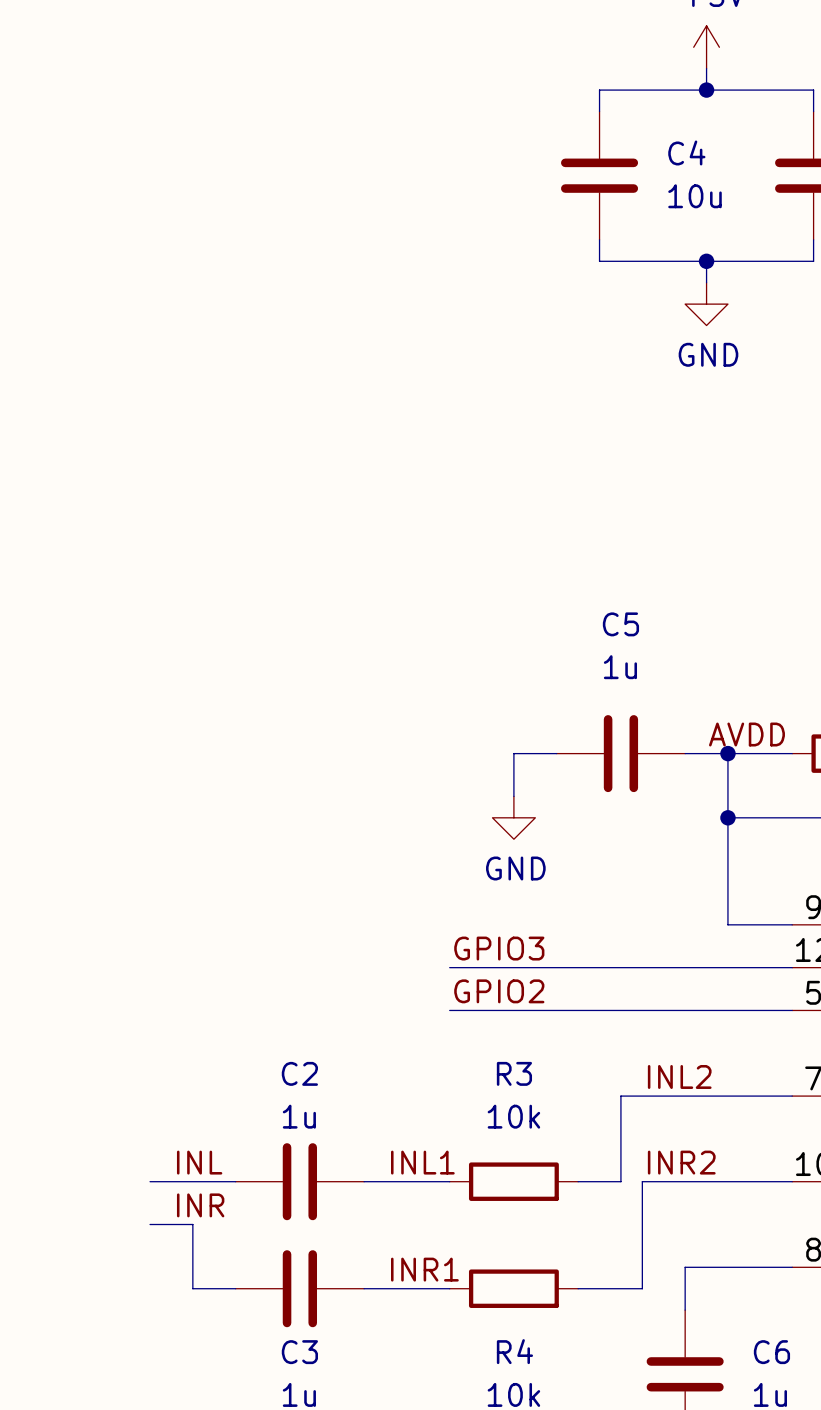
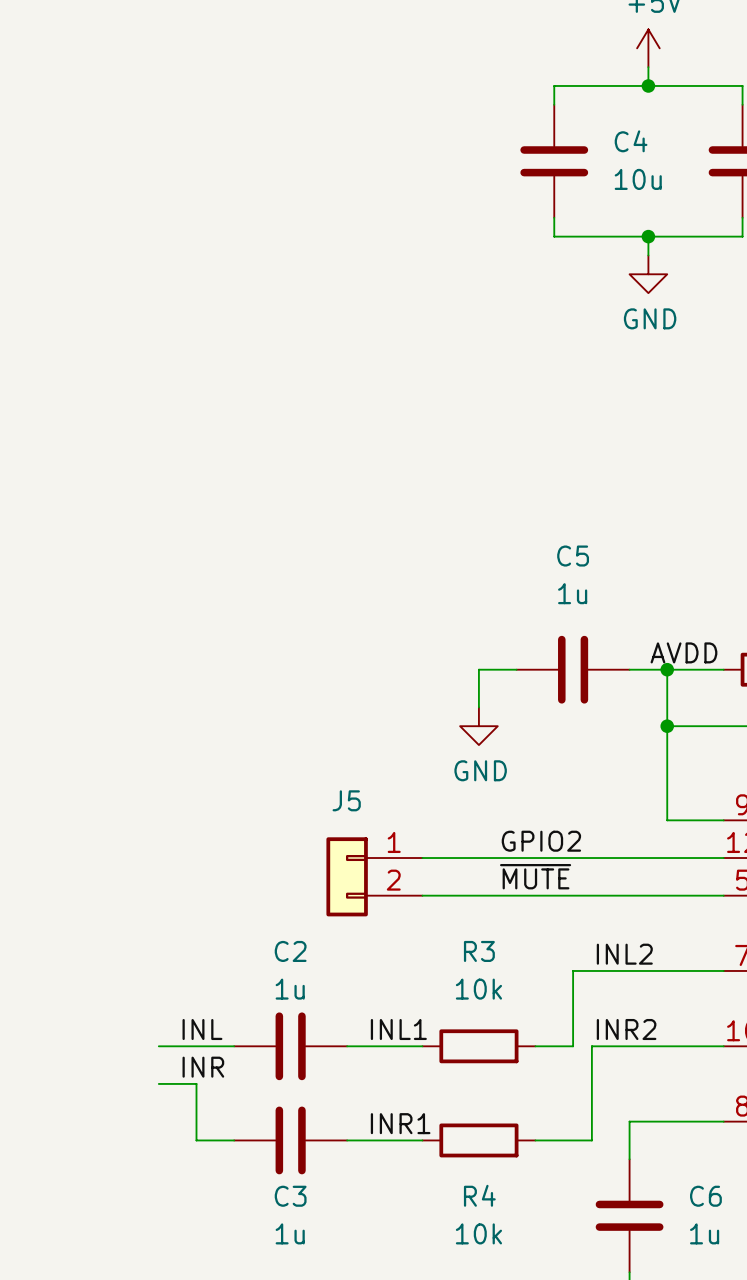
label: GPIO3 (499, 948) -> none
label: none -> ~{MUTE} (535, 876)
J5: none -> (374, 876)
label position: GPIO2 (499, 991) -> GPIO2 (541, 841)

